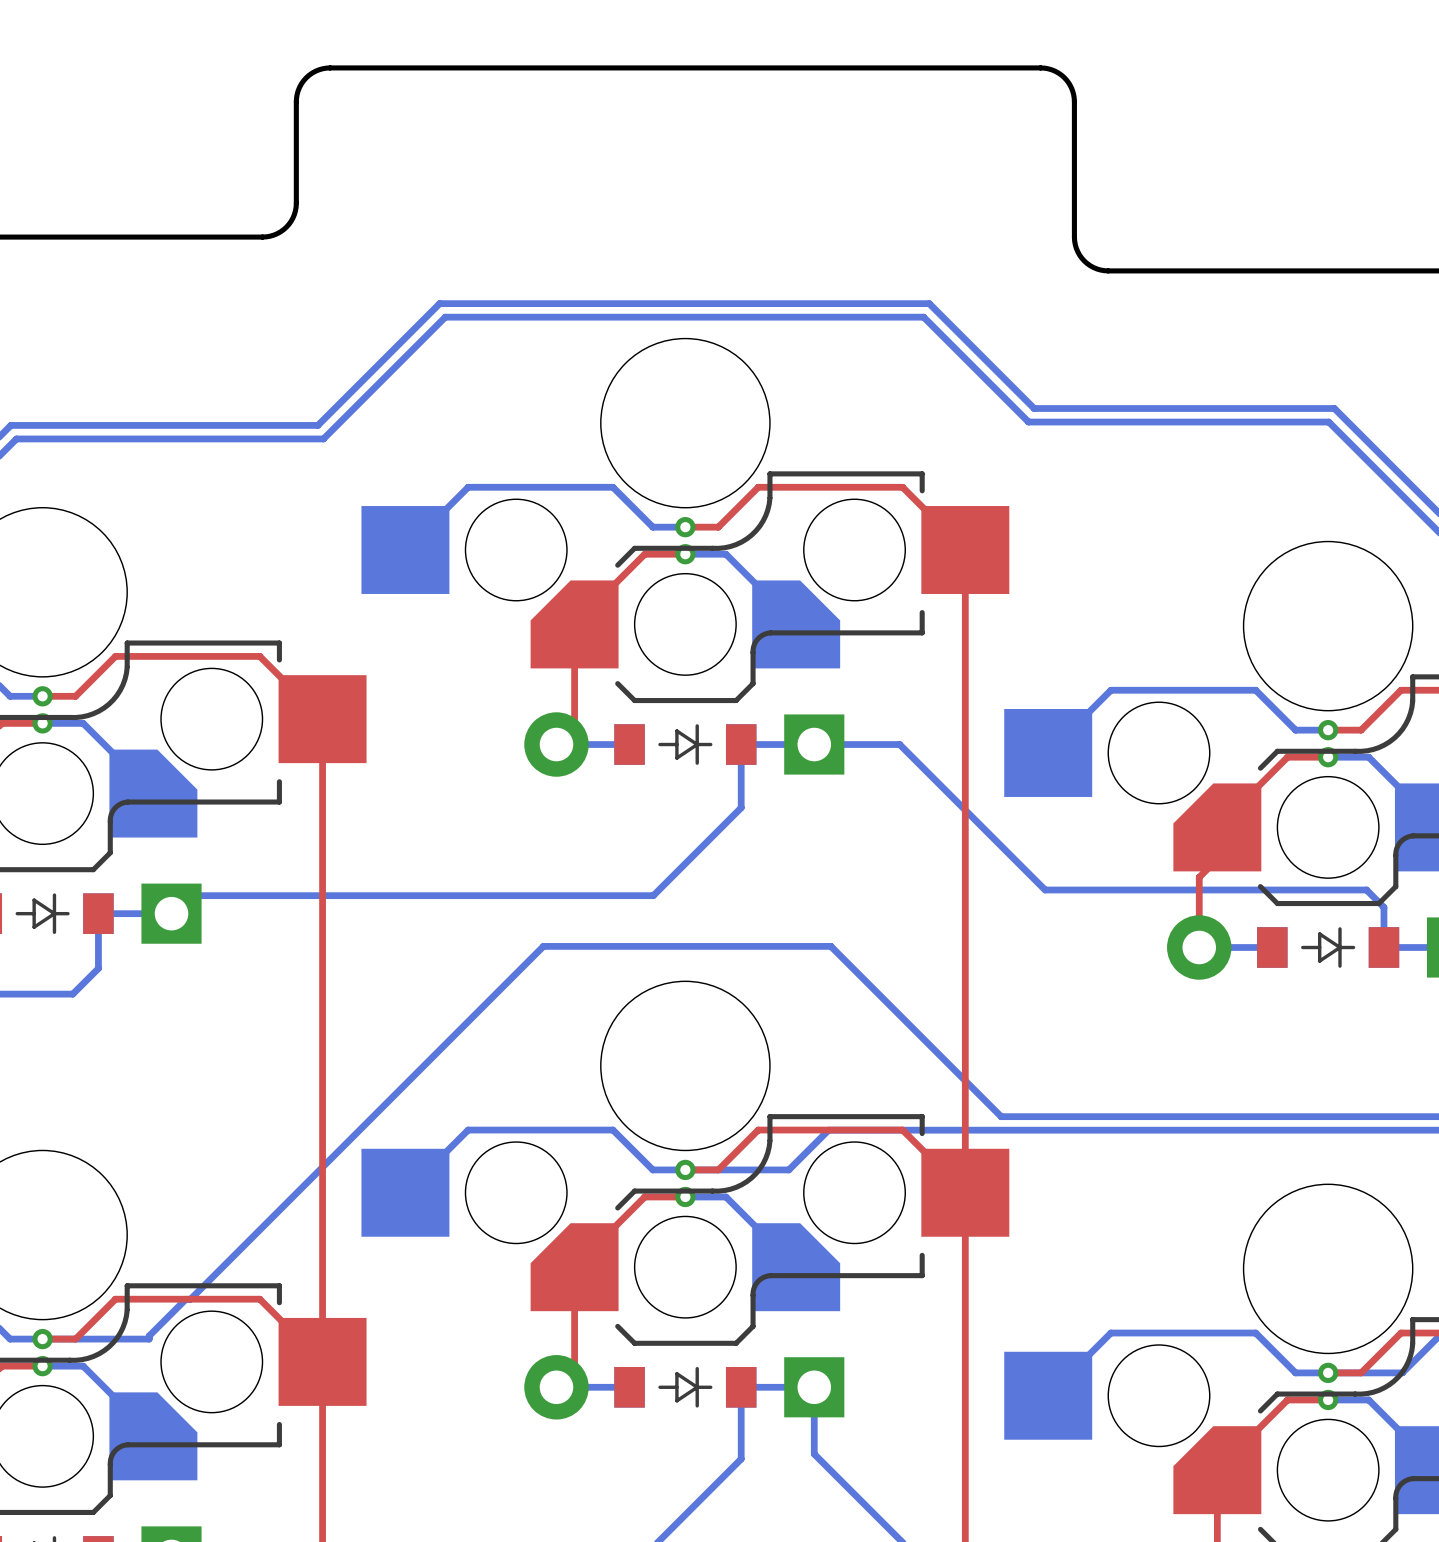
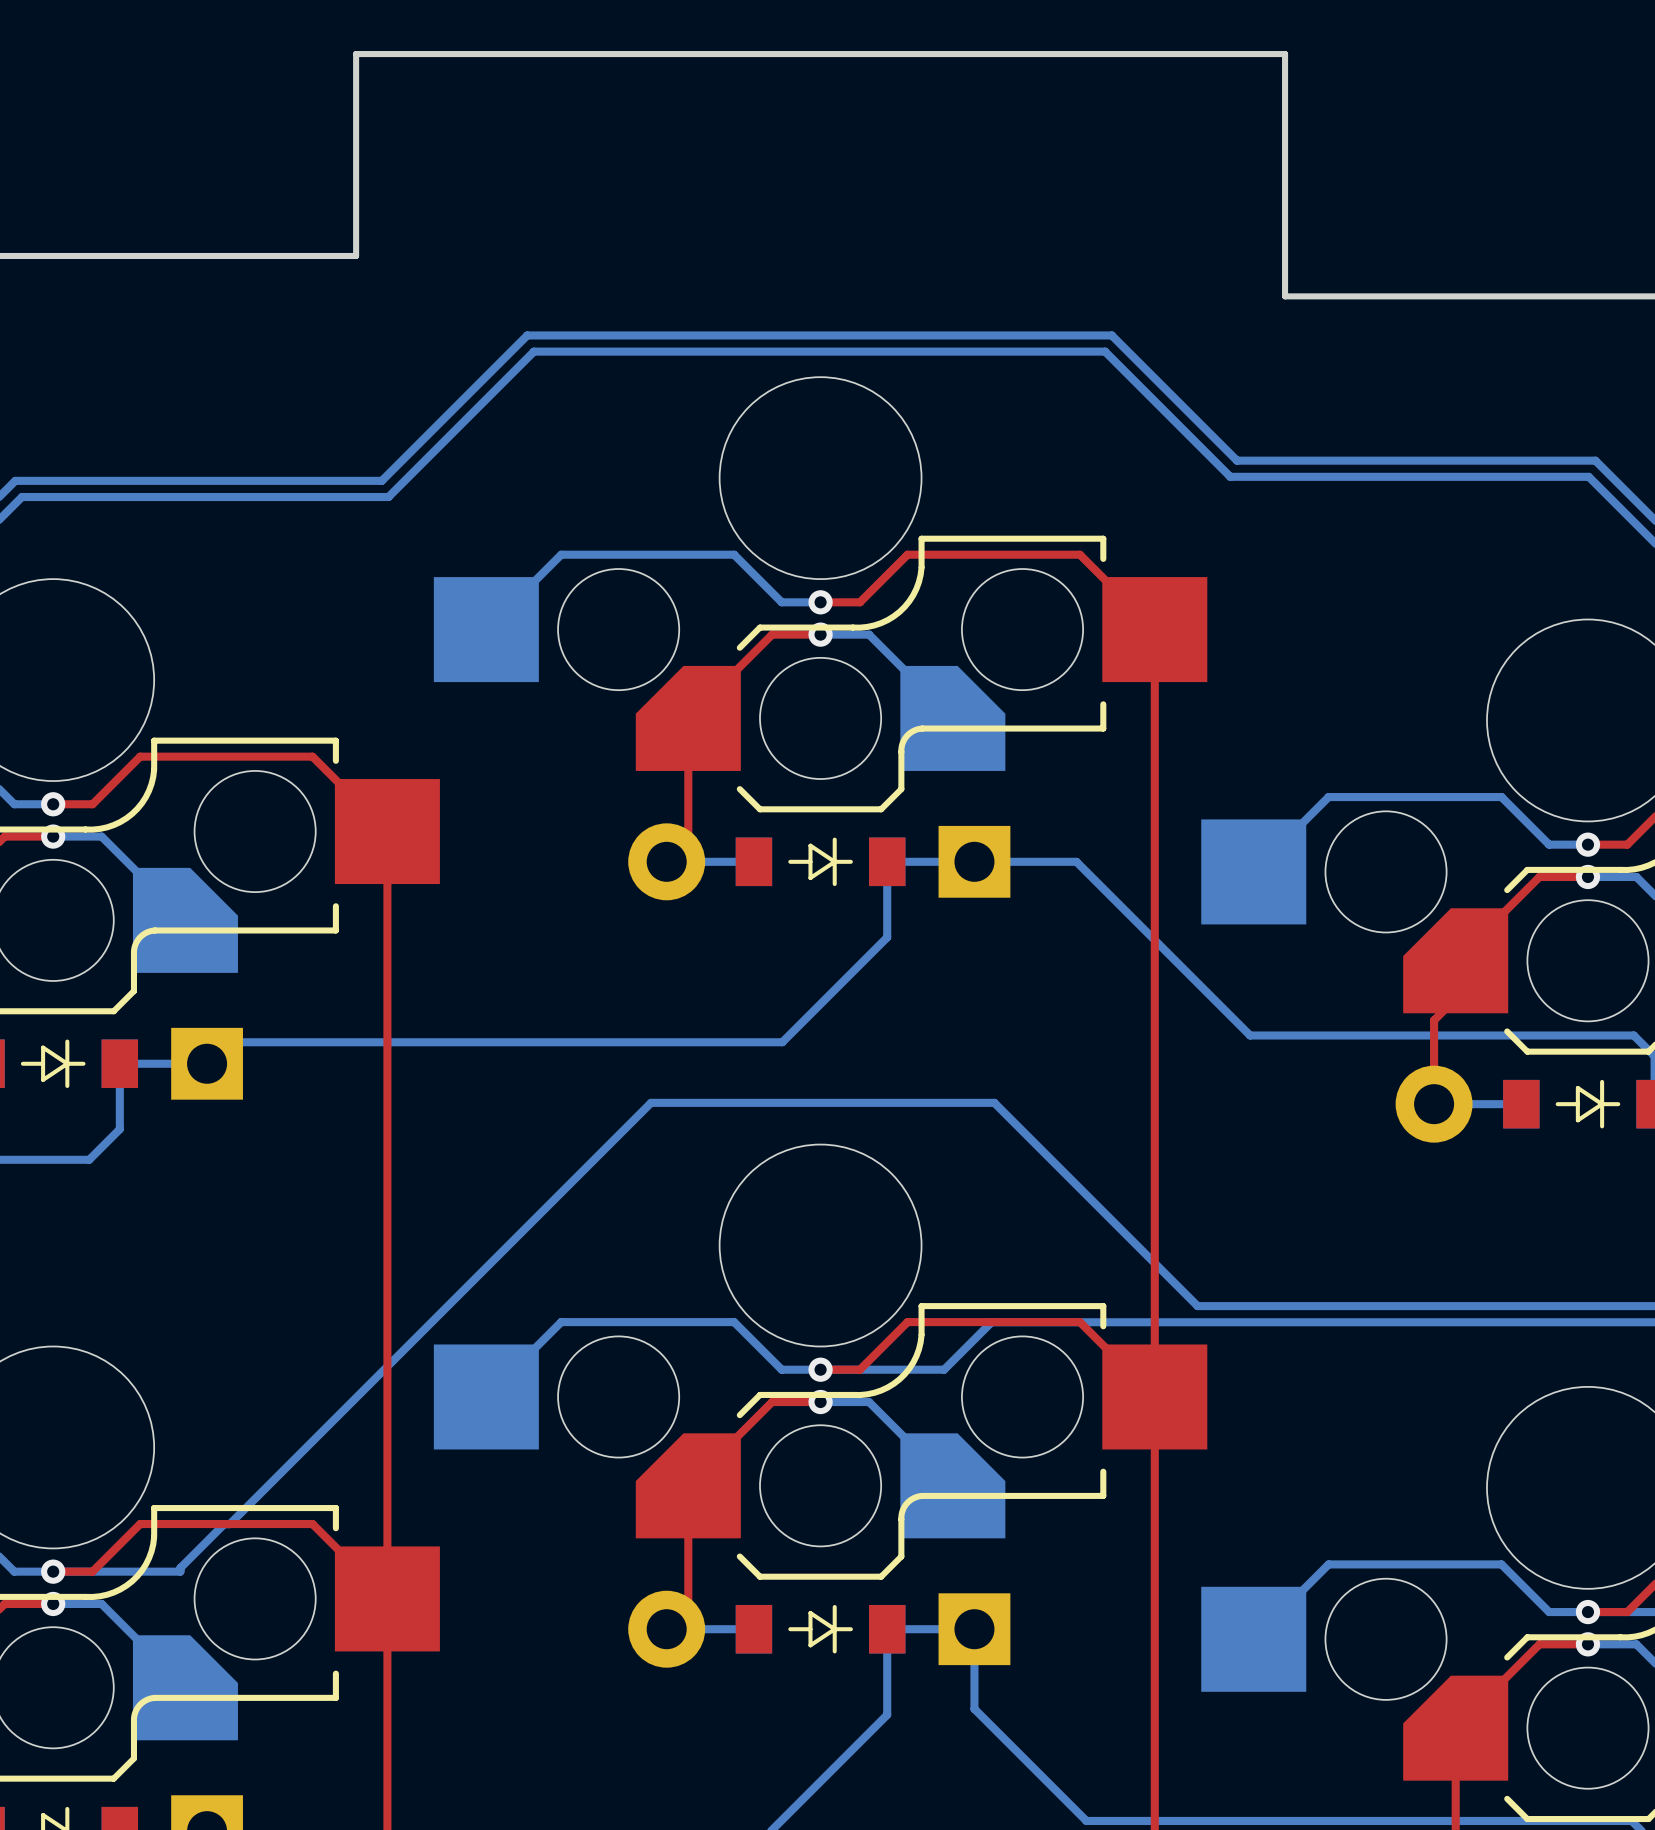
board edge: (330, 67) (315, 71) (306, 77) (299, 87) (296, 101) -> (396, 54) (356, 54) (356, 94)
board edge: (1040, 67) (1055, 71) (1064, 77) (1072, 90) (1074, 101) -> (1244, 54) (1285, 54) (1285, 94)
board edge: (296, 203) (294, 214) (286, 227) (273, 235) (262, 237) -> (356, 215) (356, 255) (315, 255)
board edge: (1074, 237) (1076, 248) (1084, 261) (1093, 267) (1108, 270) -> (1285, 255) (1285, 296) (1325, 296)

